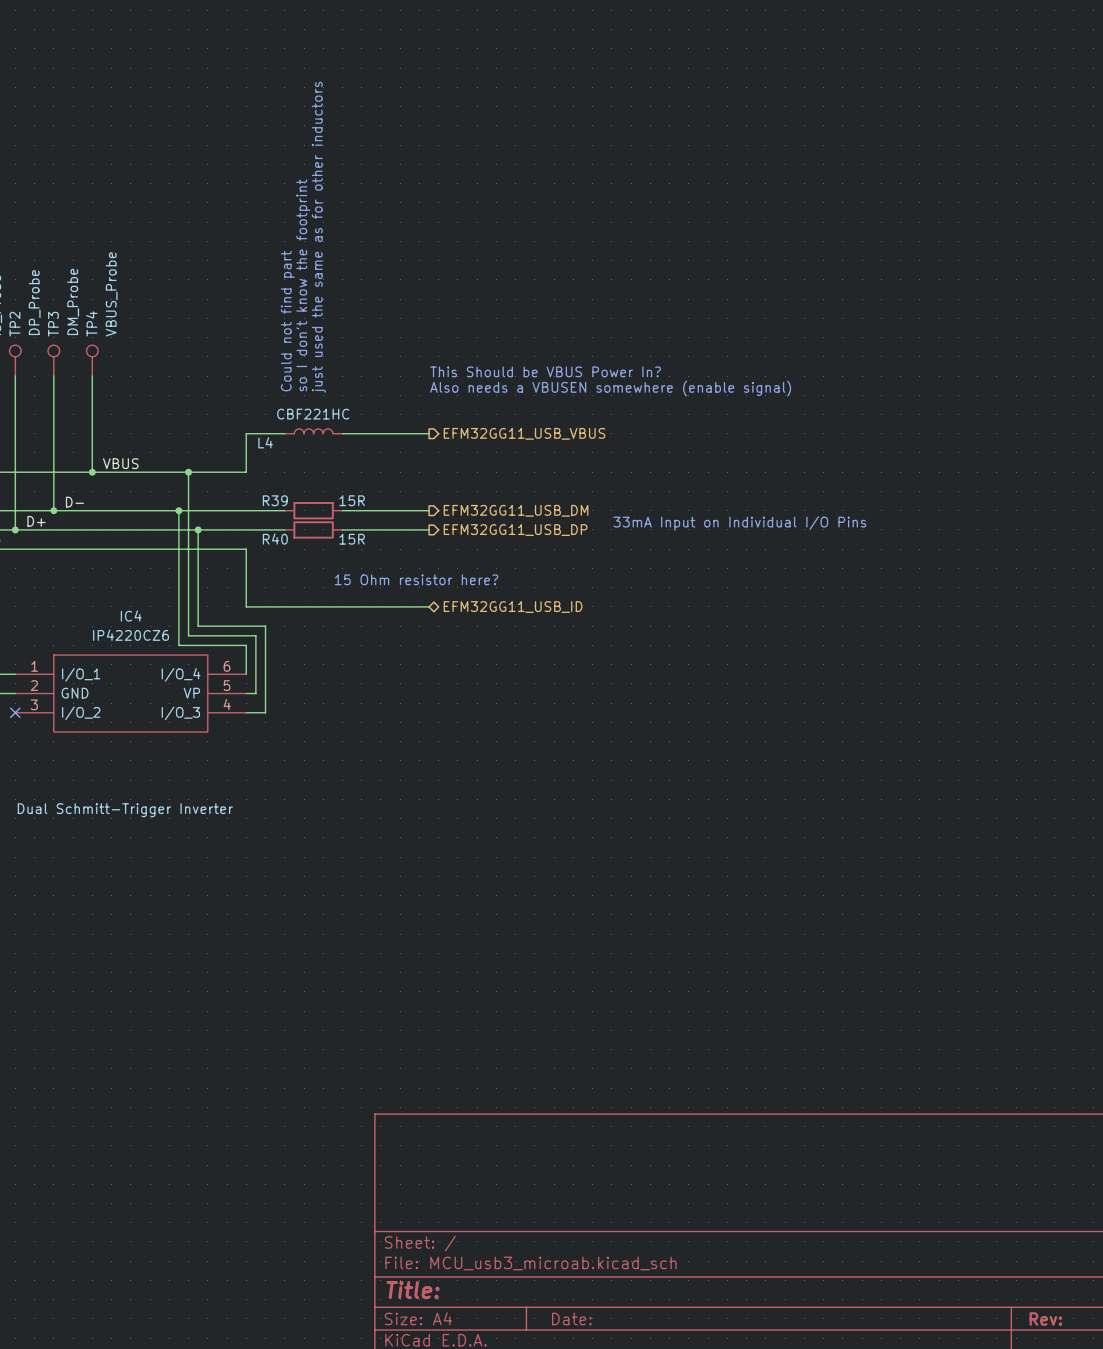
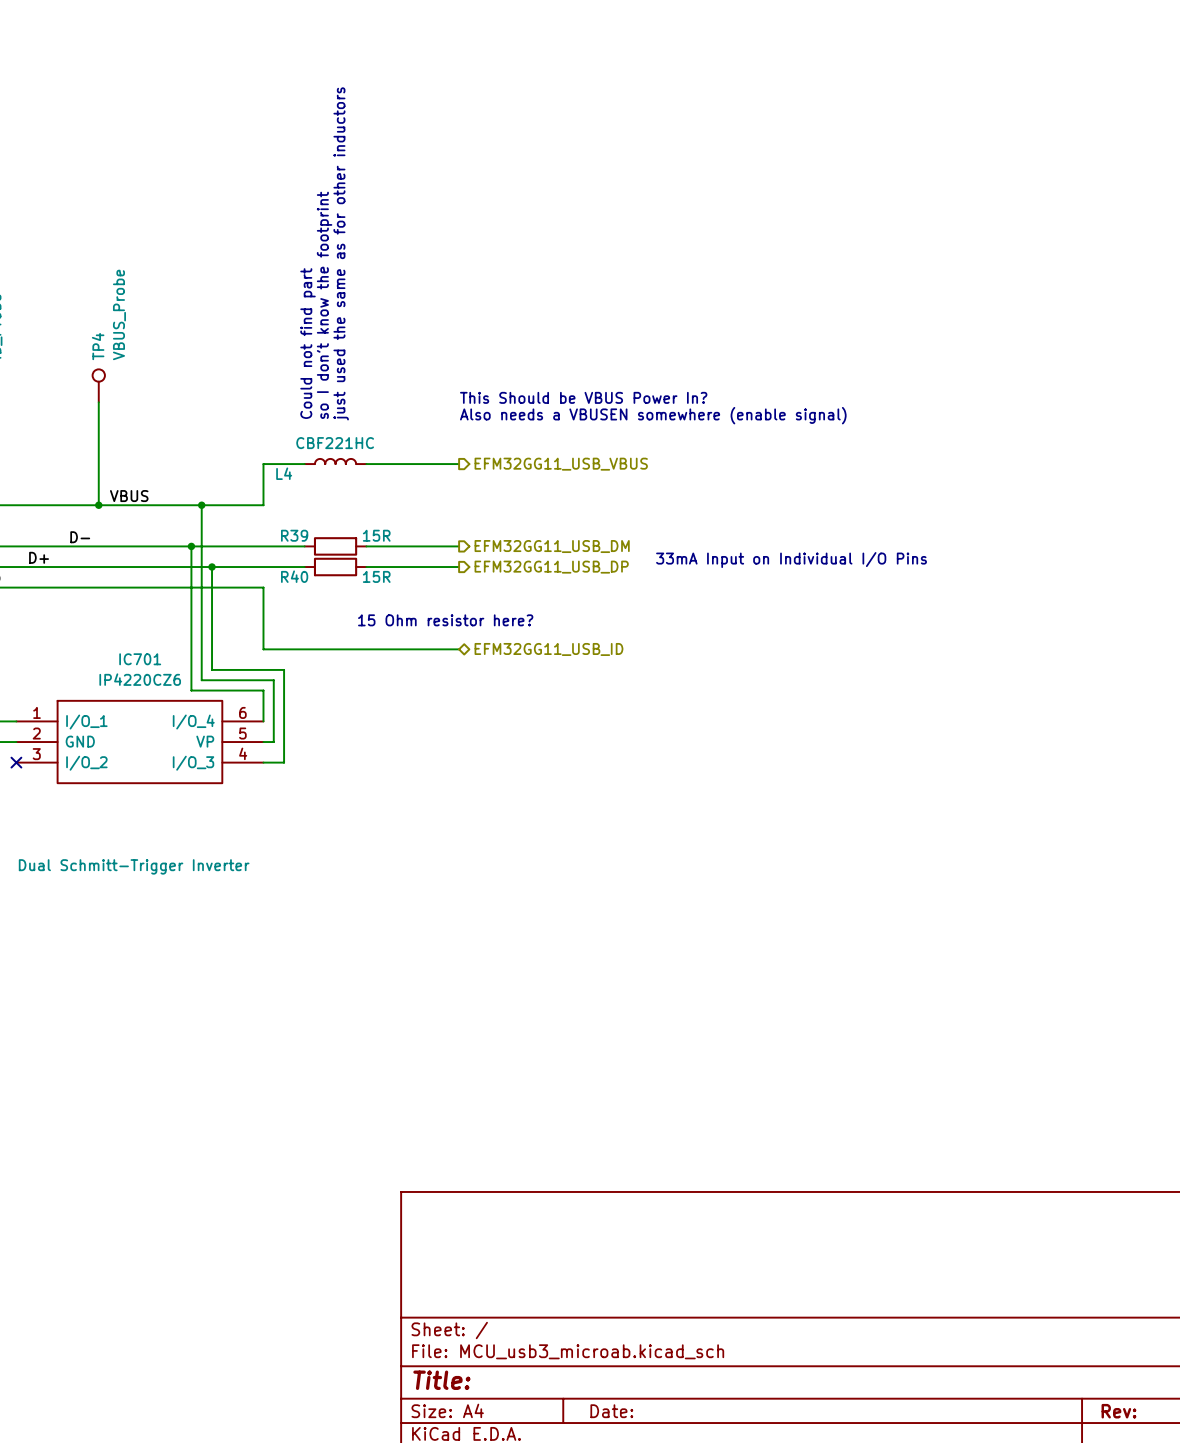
TP2: DP_Probe (15, 360) -> none
TP3: DM_Probe (53, 360) -> none
wire: (15, 376) (15, 529) -> none
wire: (53, 376) (53, 510) -> none
junction: (53, 510) -> none
junction: (15, 529) -> none
IC4 name: IC4 (131, 615) -> IC701 (140, 659)

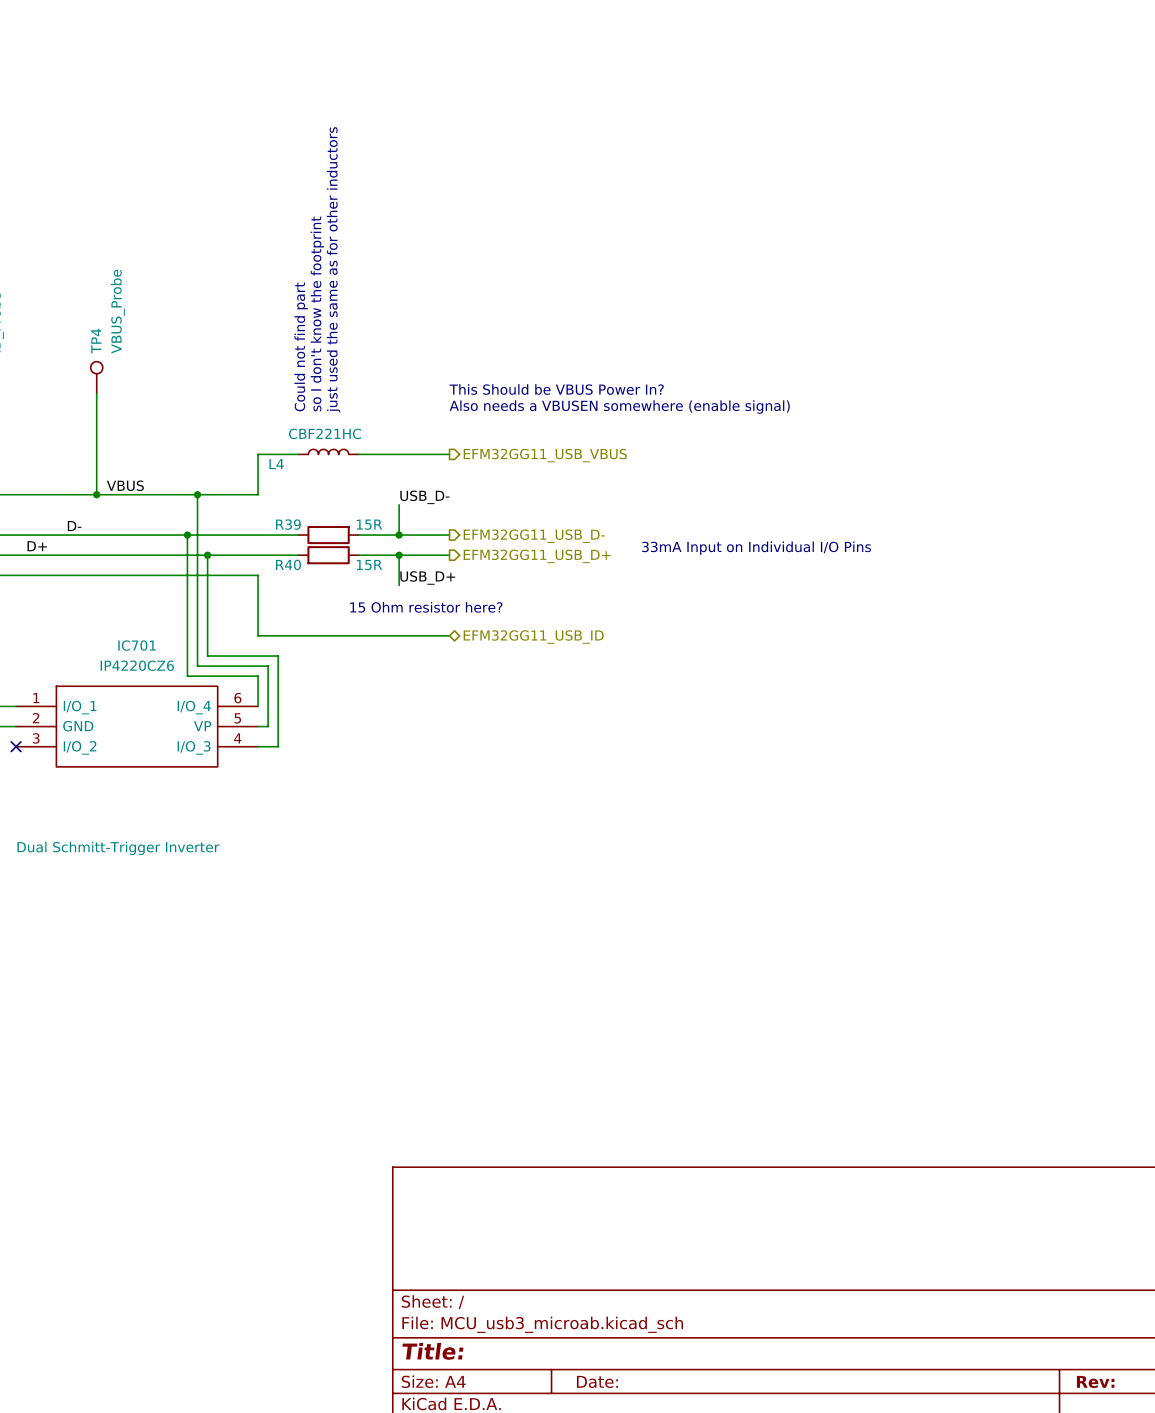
label: none -> USB_D- (424, 497)
wire: none -> (399, 504) (399, 535)
junction: none -> (399, 535)
hierarchical label: EFM32GG11_USB_DM (552, 546) -> EFM32GG11_USB_D- (534, 536)
wire: none -> (399, 555) (399, 585)
junction: none -> (399, 555)
hierarchical label: EFM32GG11_USB_DP (551, 567) -> EFM32GG11_USB_D+ (537, 556)
label: none -> USB_D+ (427, 577)

